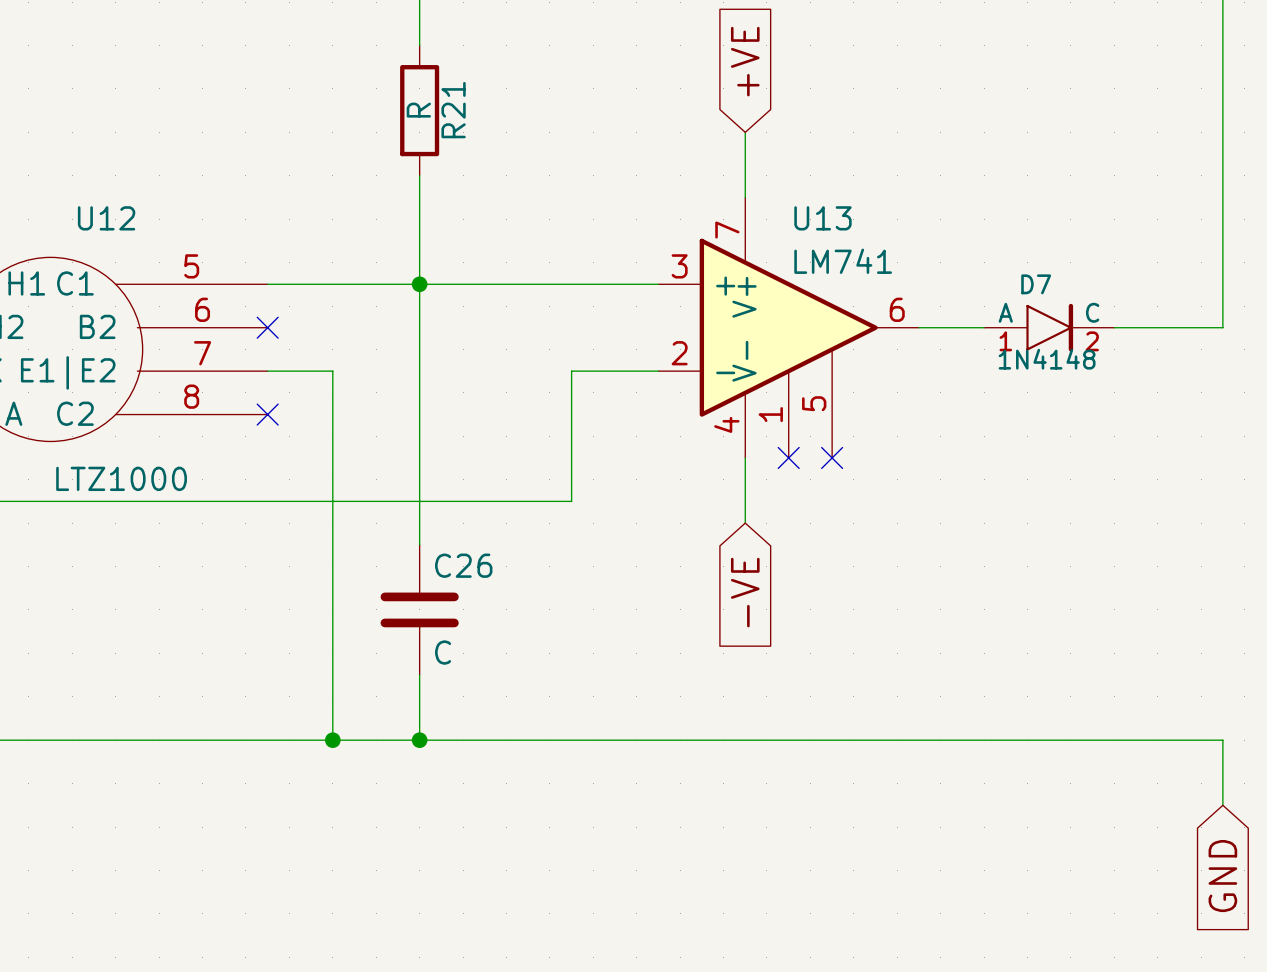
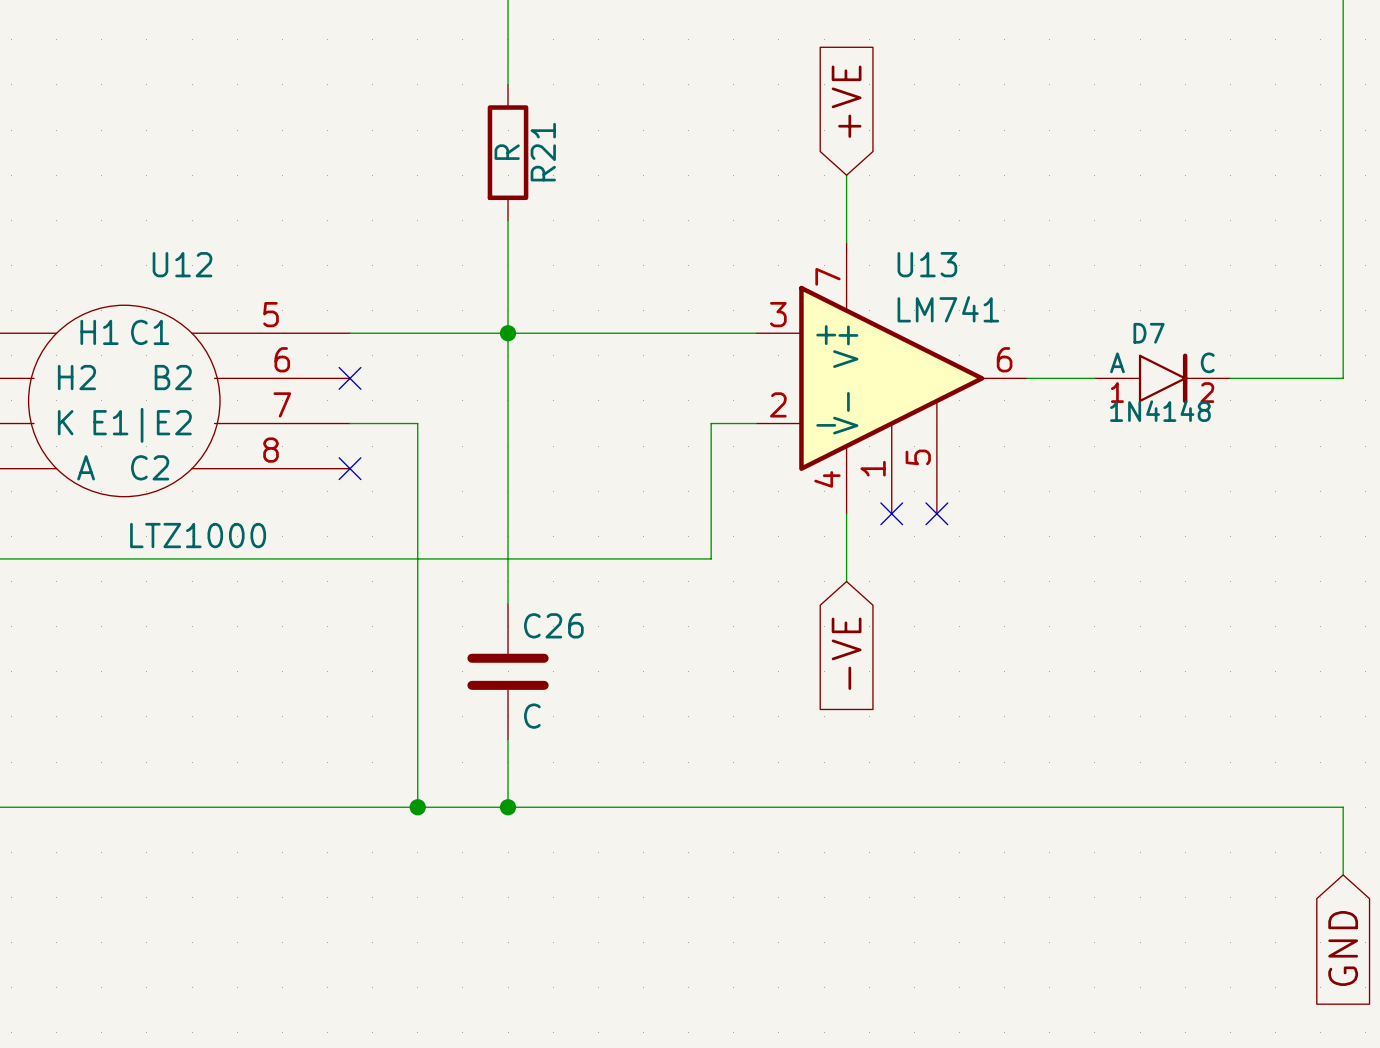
wire: (615, 371) (571, 371) (571, 501) -> (711, 423) (711, 558) (666, 558)

